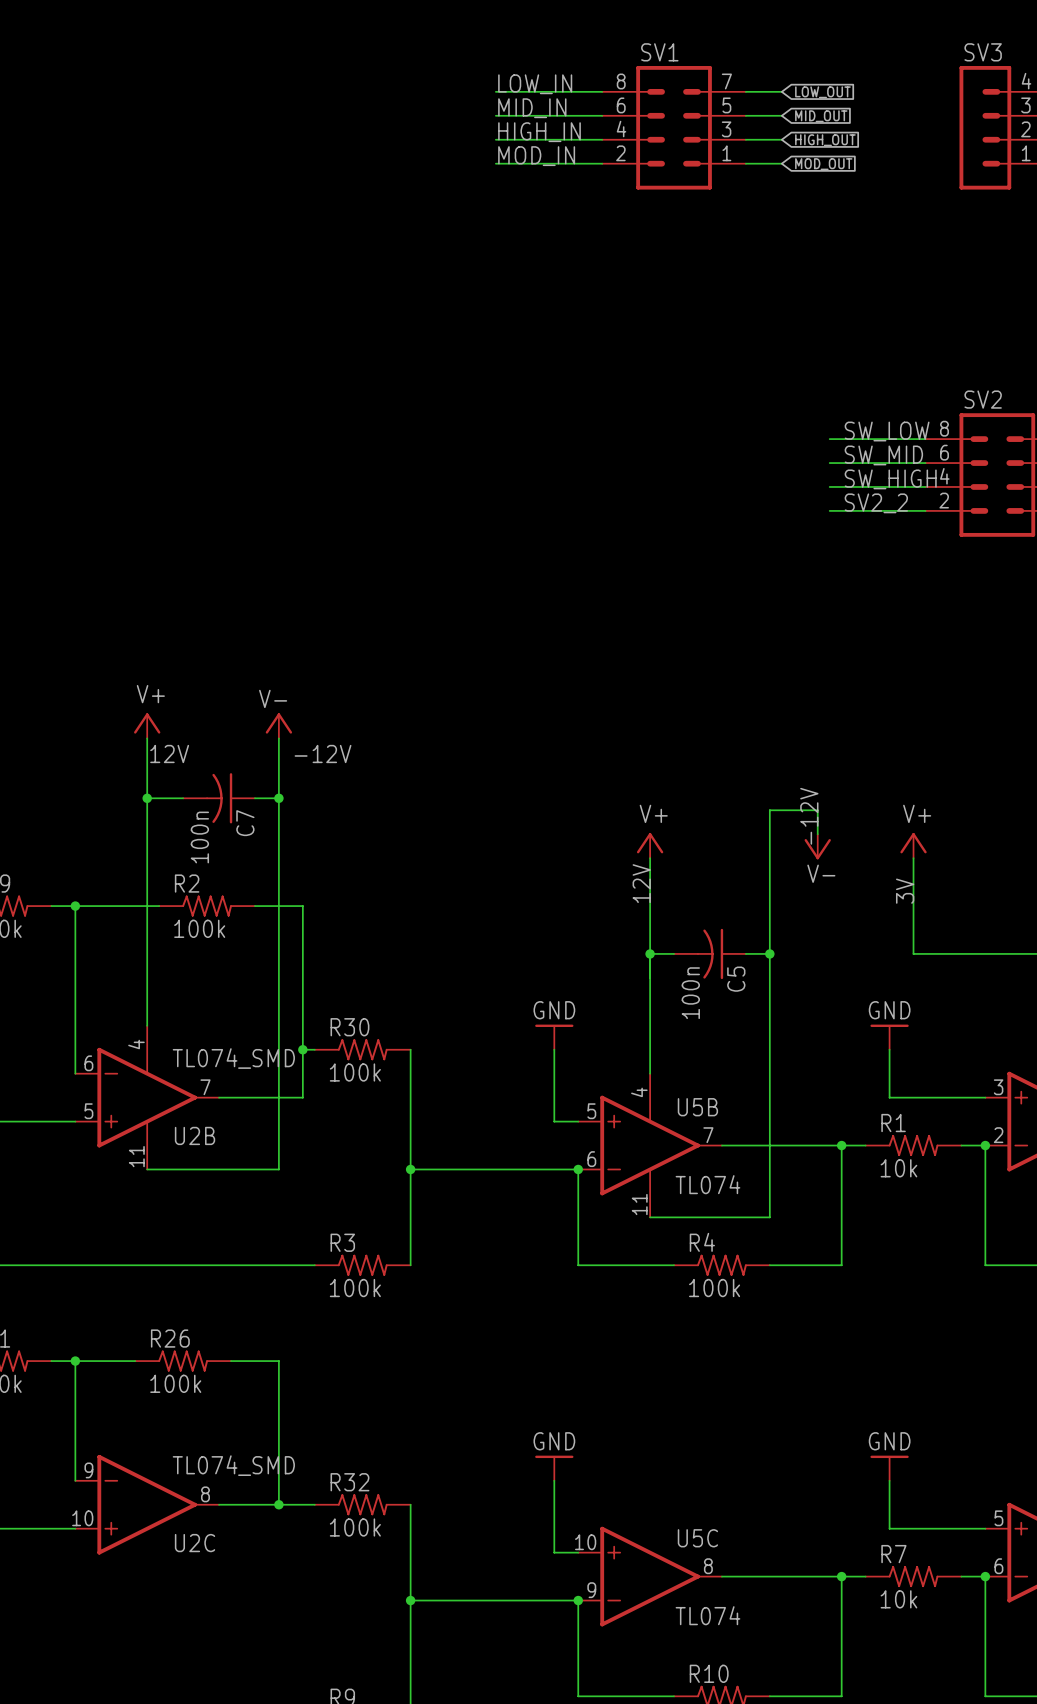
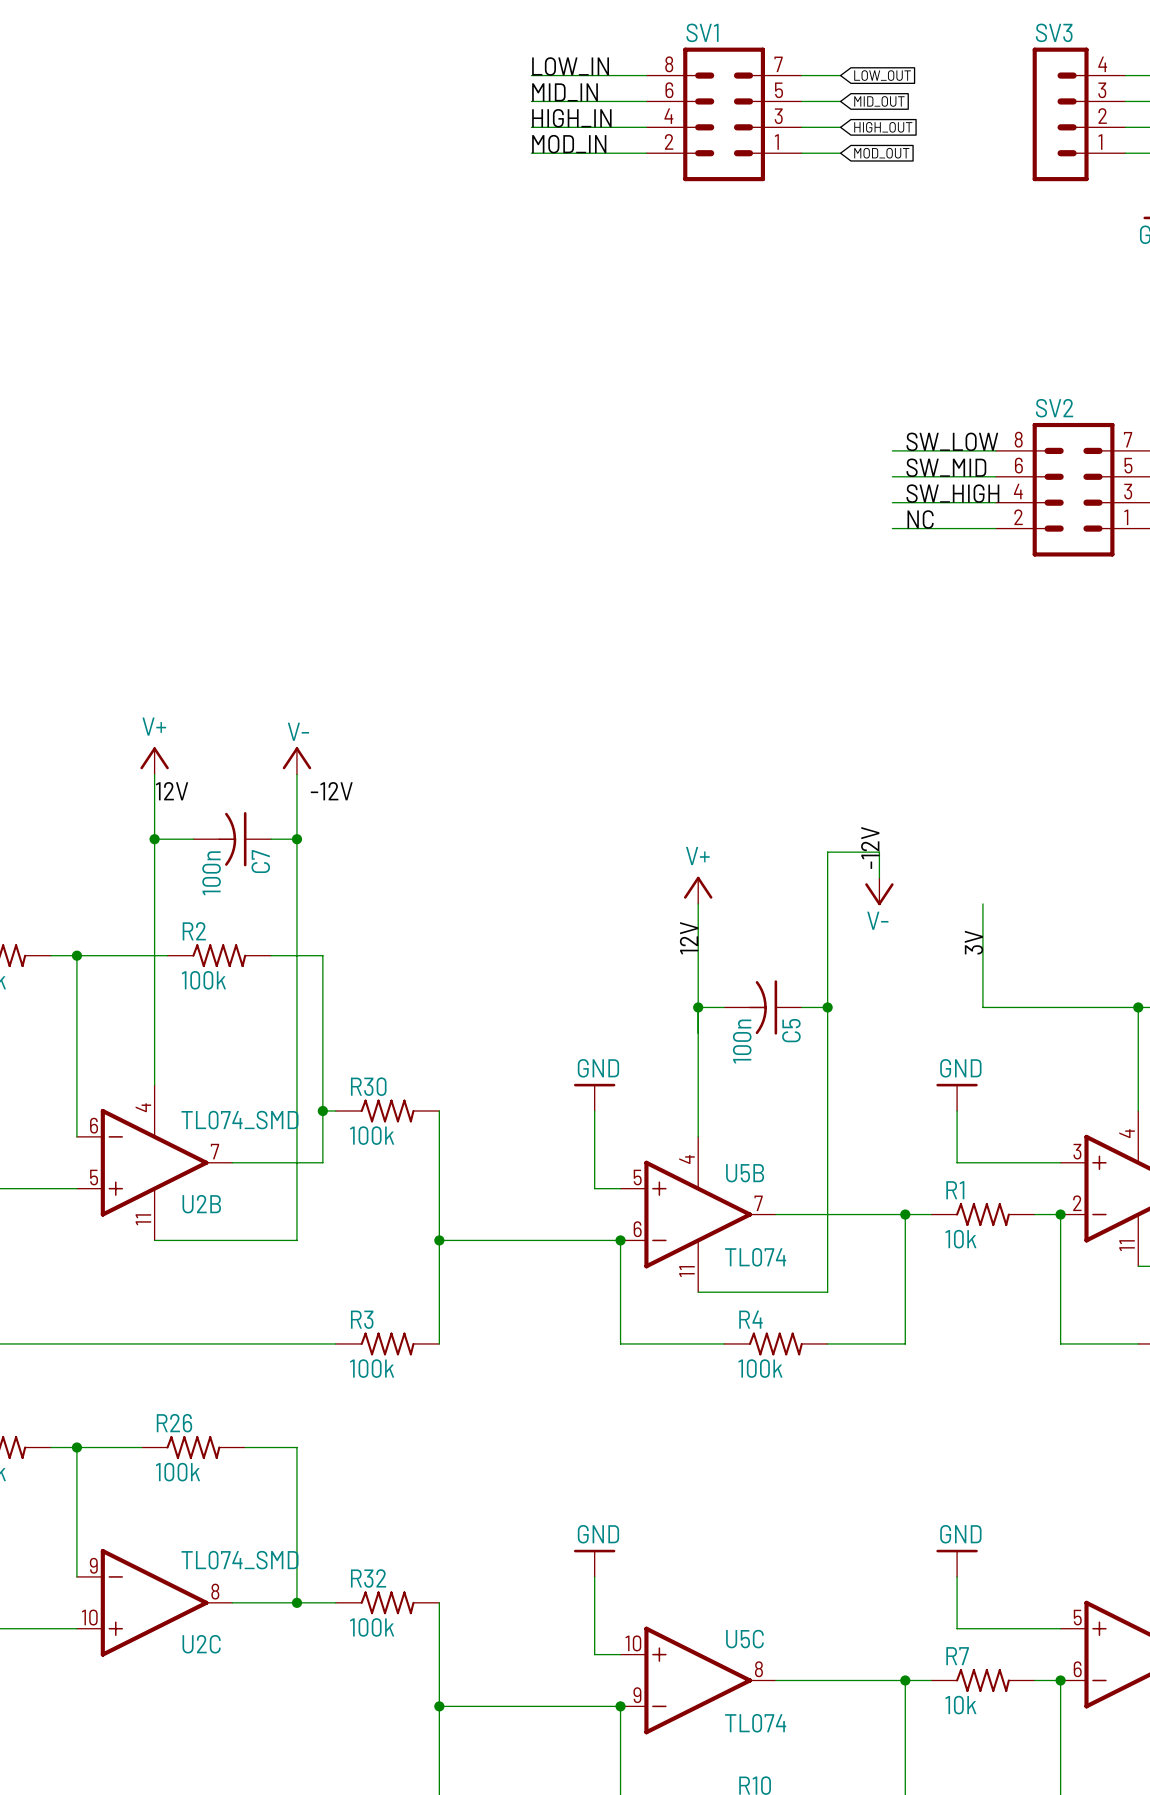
label: SV2_2 (876, 503) -> NC (920, 519)
power symbol: V+ (913, 845) -> none

